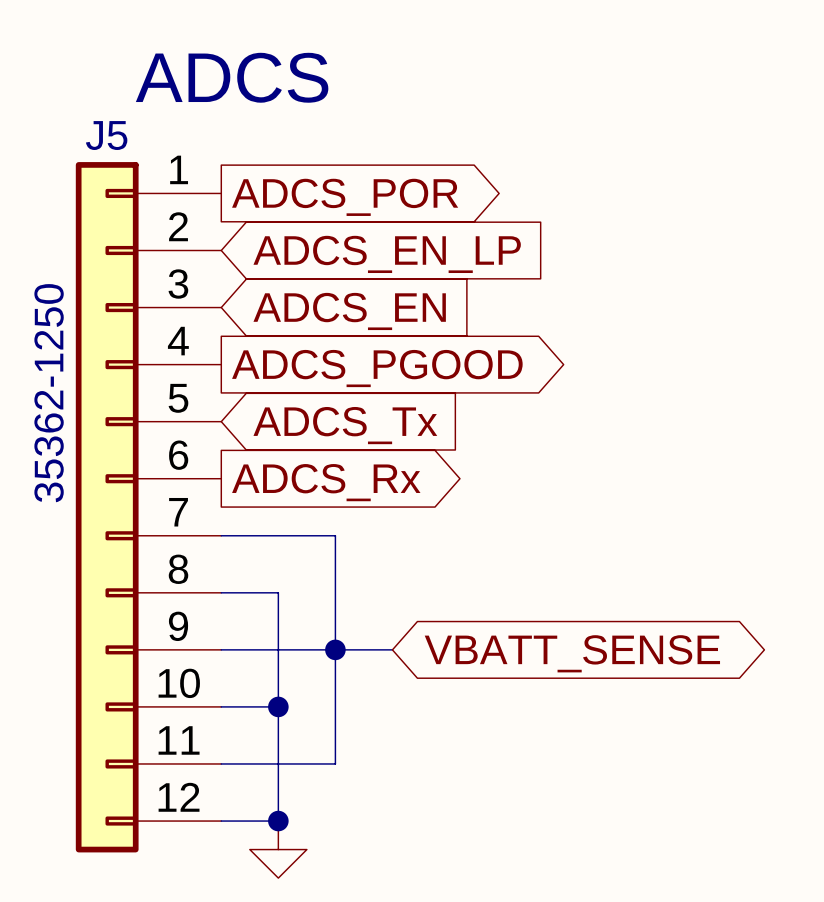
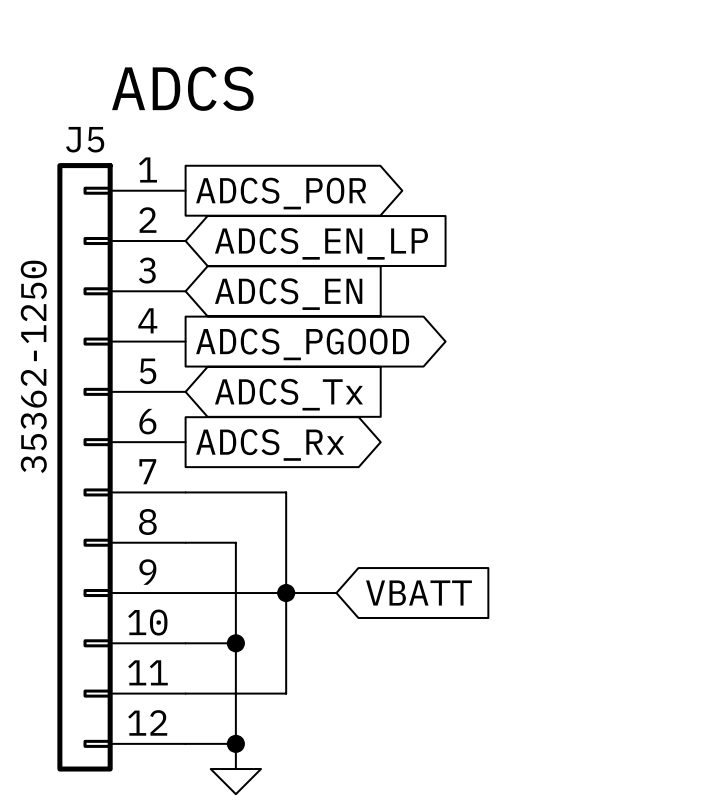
global label shape: bidirectional (572, 653) -> input (418, 593)
global label: VBATT_SENSE (572, 653) -> VBATT (418, 593)

